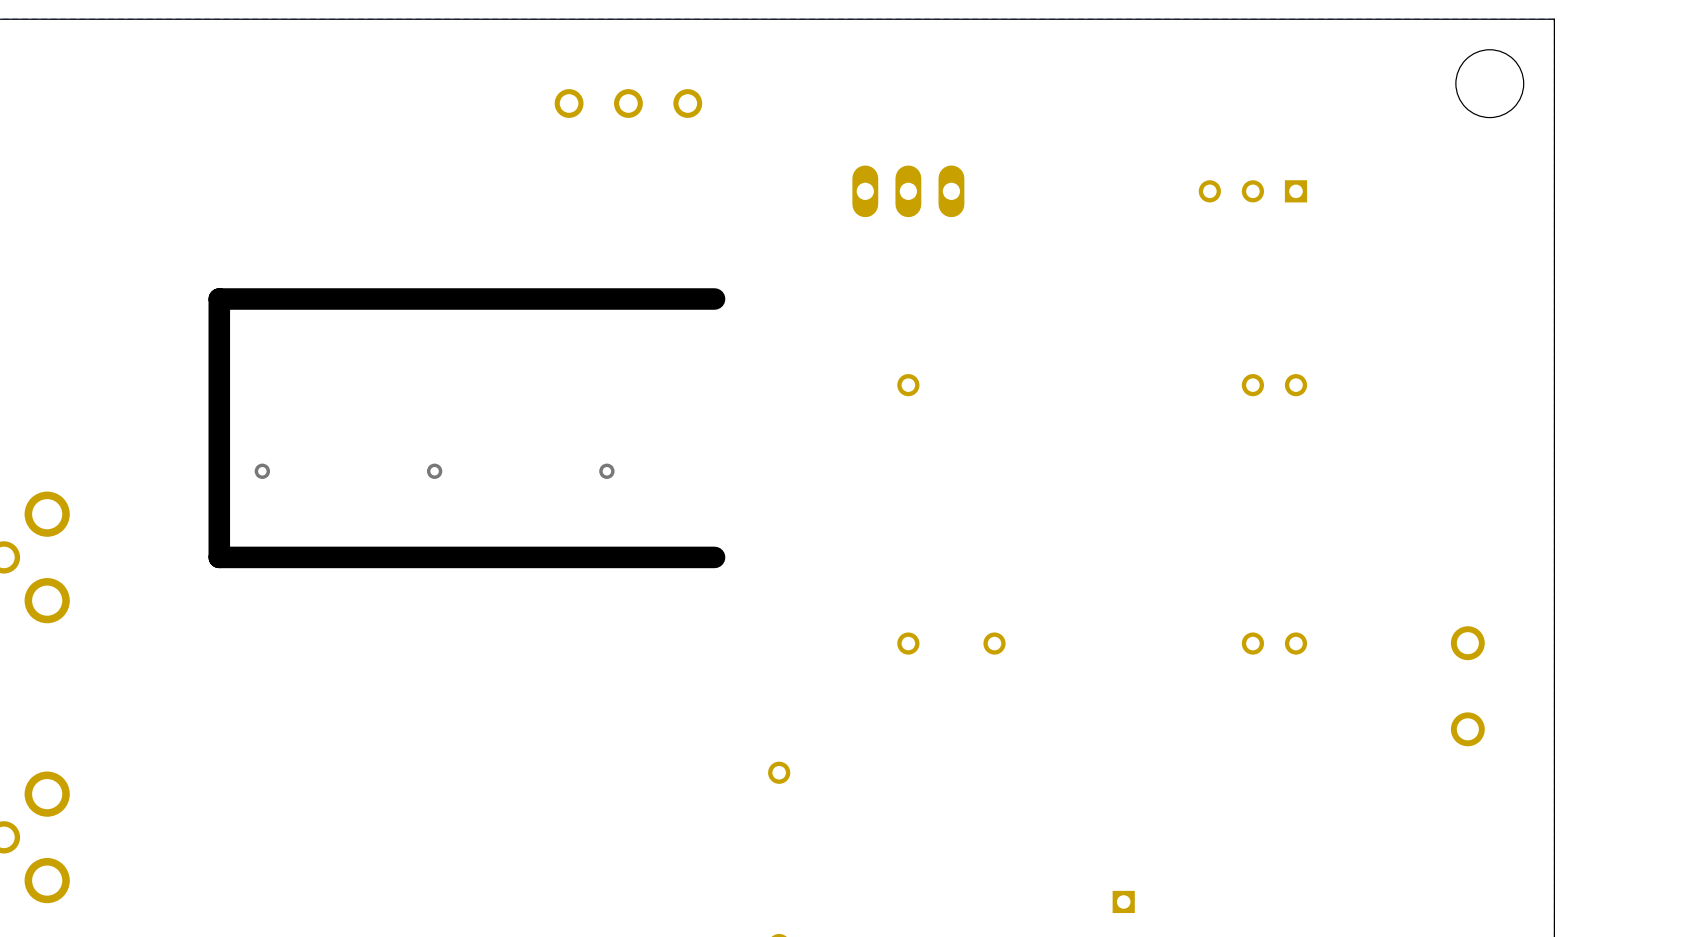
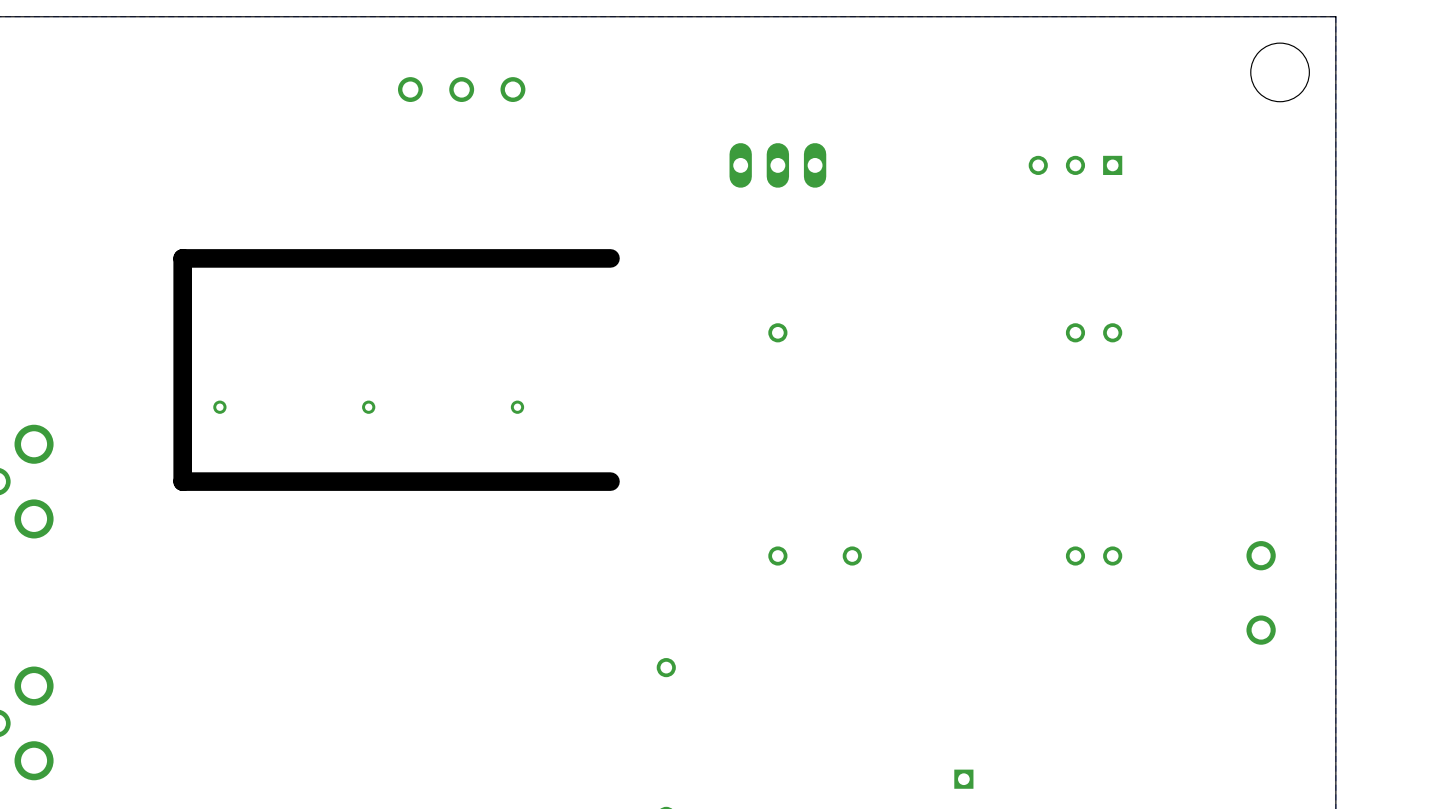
part position: (628, 103) -> (461, 89)

